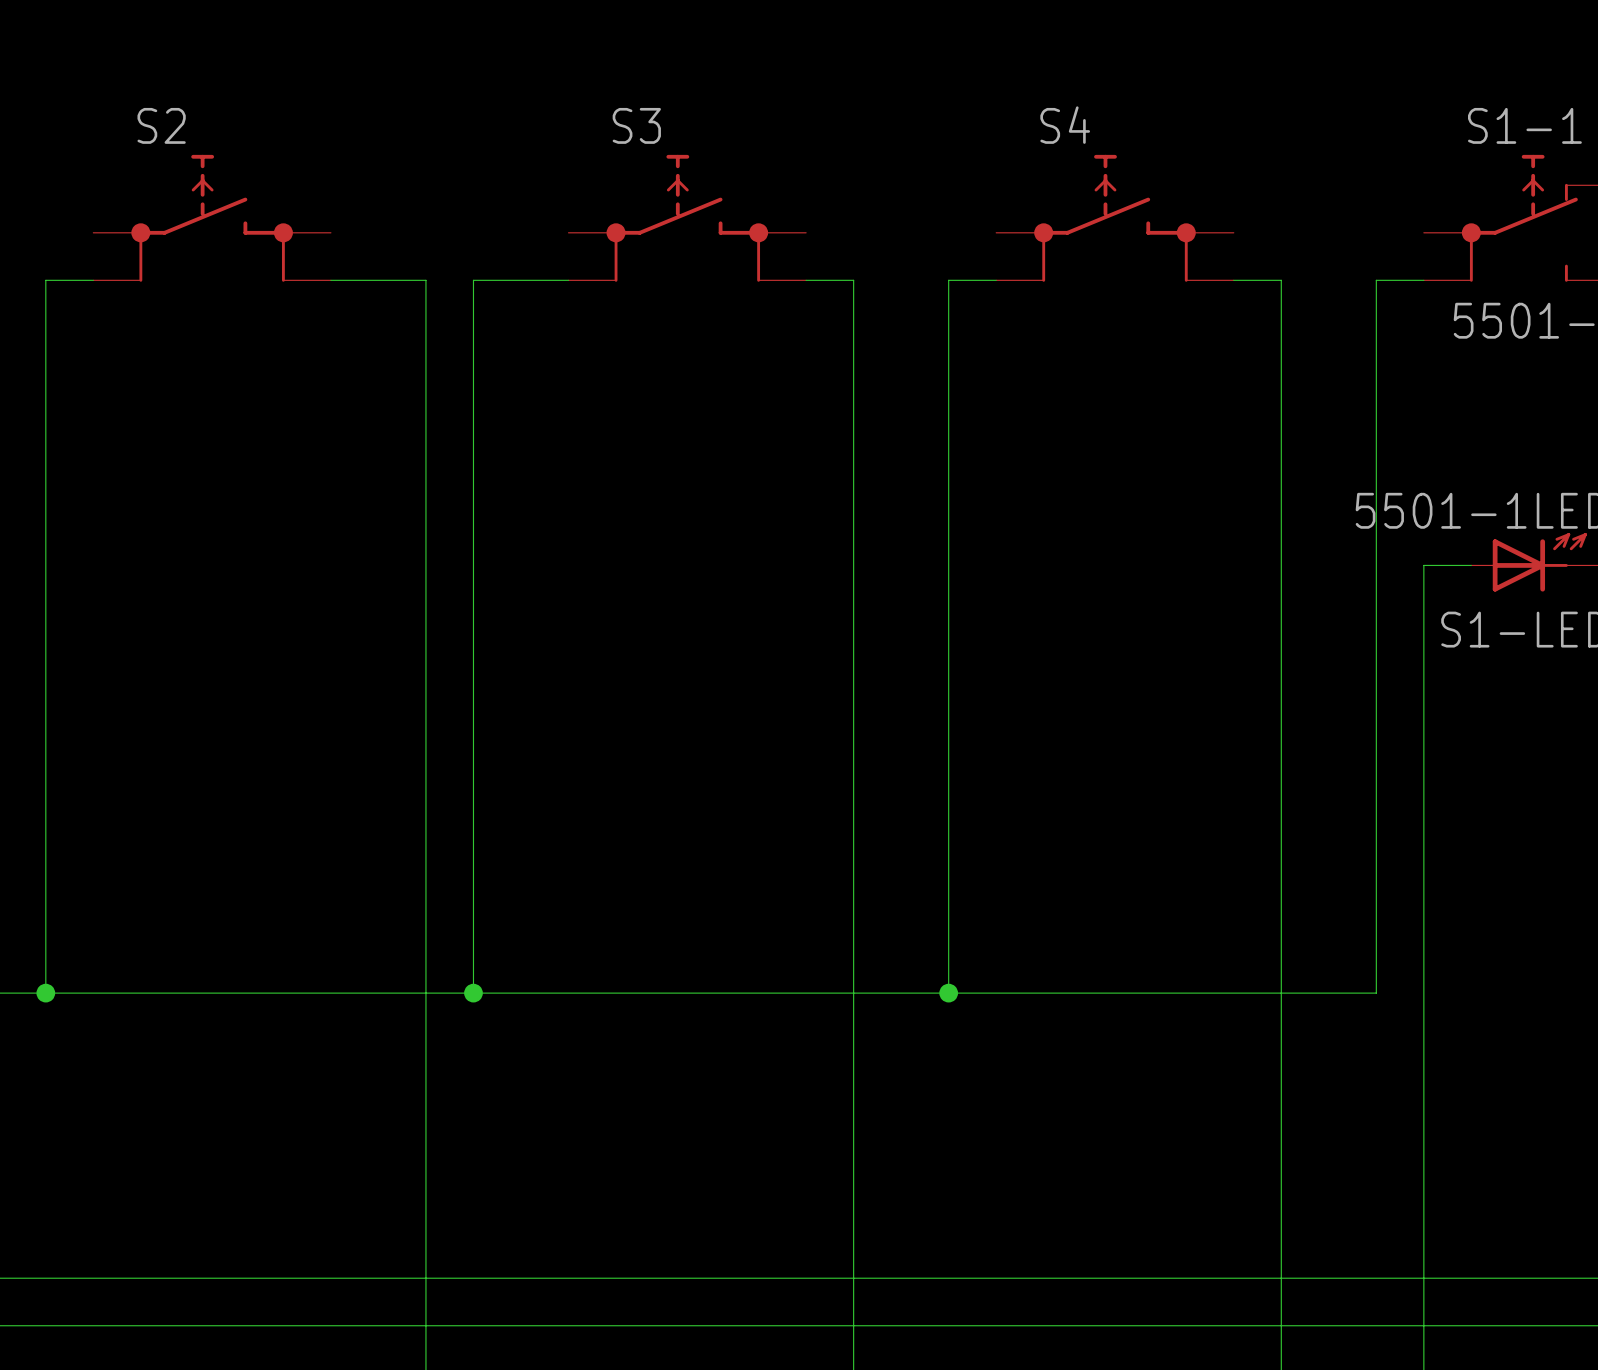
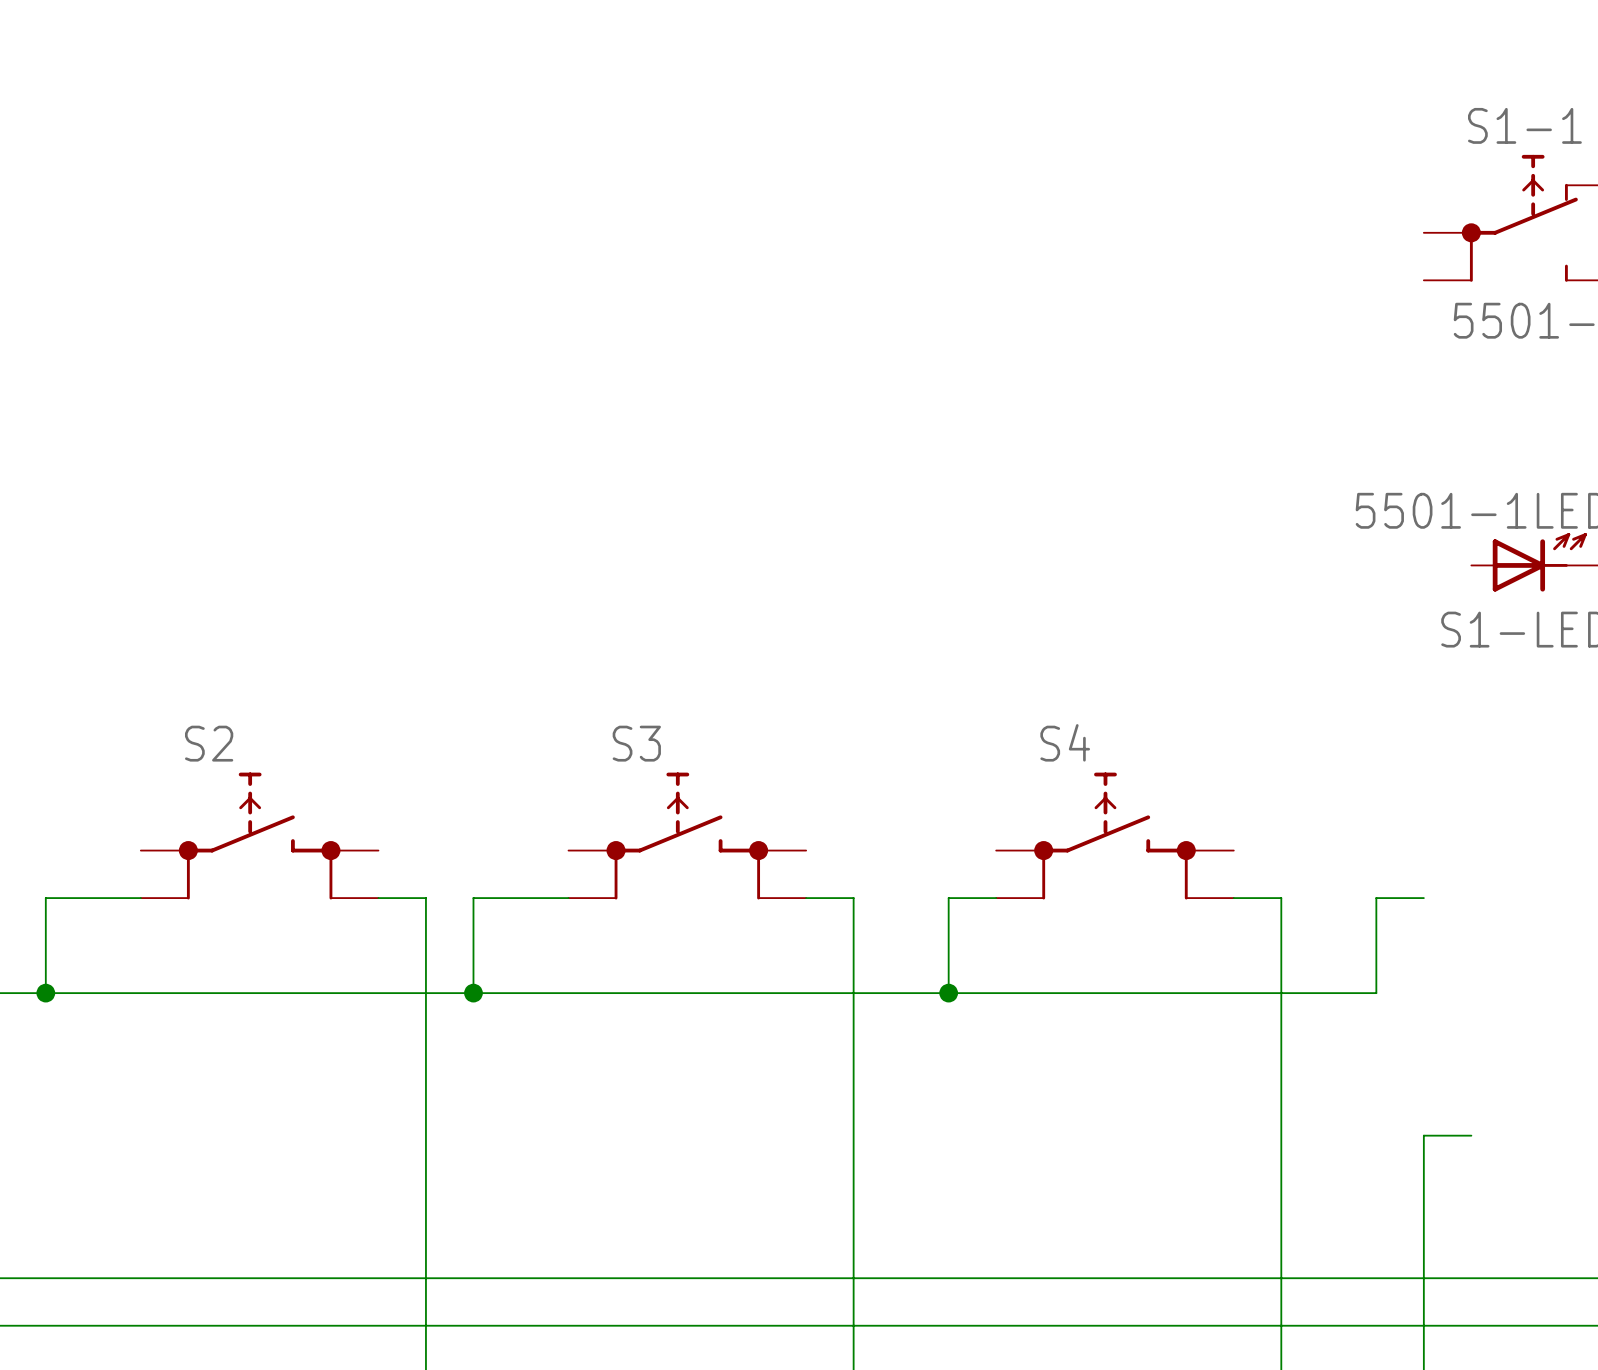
S2 position: (212, 218) -> (259, 836)
S3 position: (687, 218) -> (687, 836)
S4 position: (1114, 218) -> (1114, 836)
wire: (93, 280) (45, 280) (45, 898) -> (140, 898) (45, 898)
wire: (330, 280) (425, 280) (425, 898) -> (378, 898) (425, 898)
wire: (568, 280) (473, 280) (473, 898) -> (568, 898) (473, 898)
wire: (806, 280) (853, 280) (853, 898) -> (806, 898) (853, 898)
wire: (996, 280) (948, 280) (948, 898) -> (996, 898) (948, 898)
wire: (1233, 280) (1281, 280) (1281, 898) -> (1233, 898) (1281, 898)
wire: (1423, 280) (1376, 280) (1376, 898) -> (1423, 898) (1376, 898)
wire: (1471, 565) (1423, 565) (1423, 1135) -> (1471, 1135) (1423, 1135)

